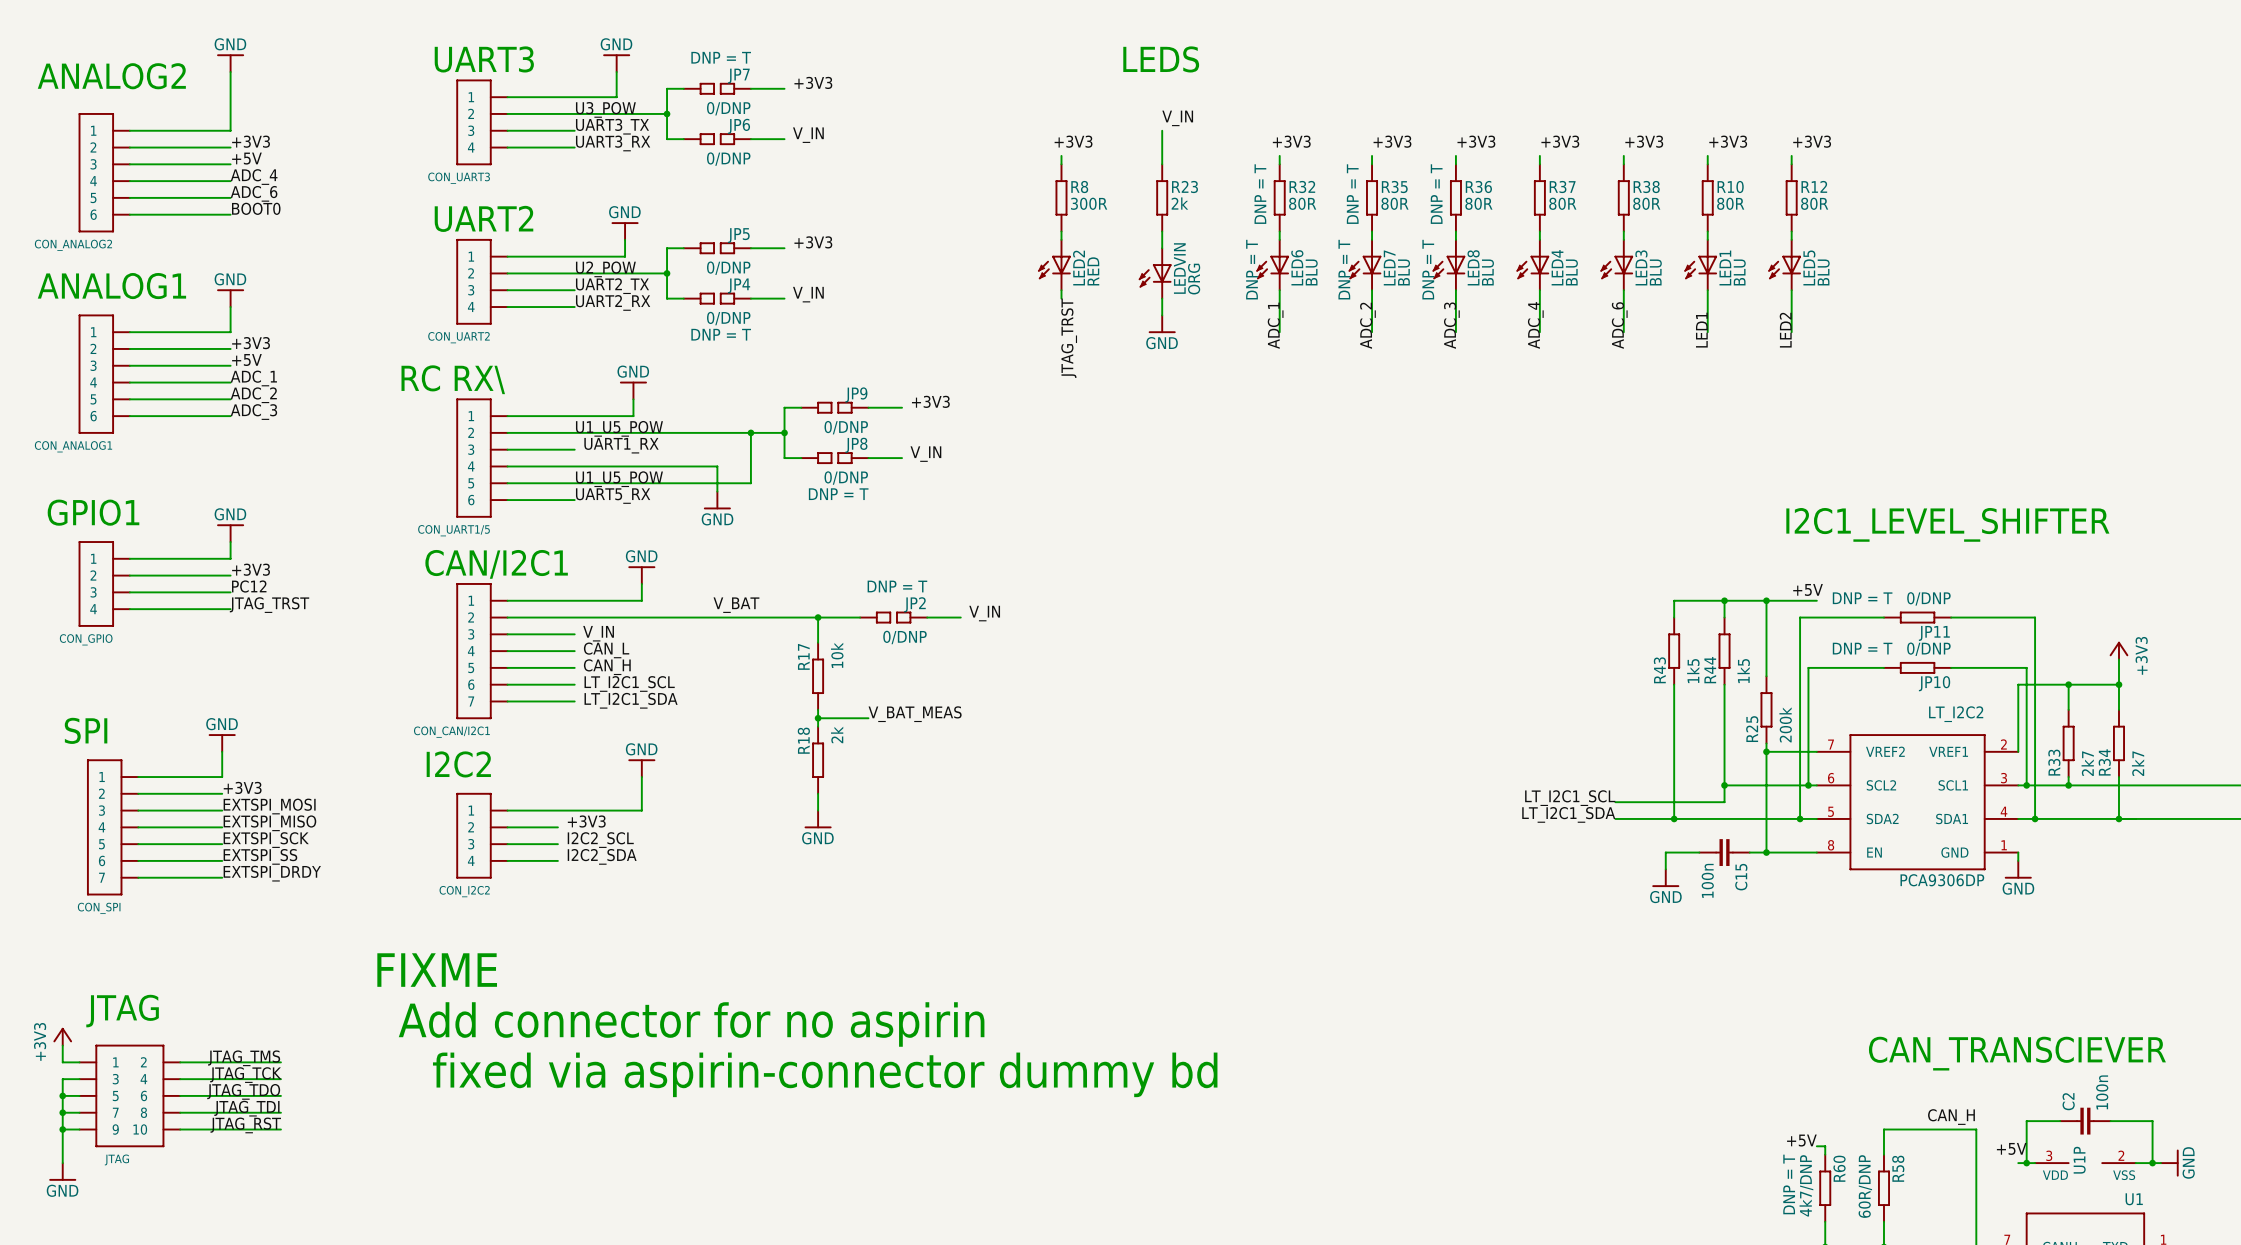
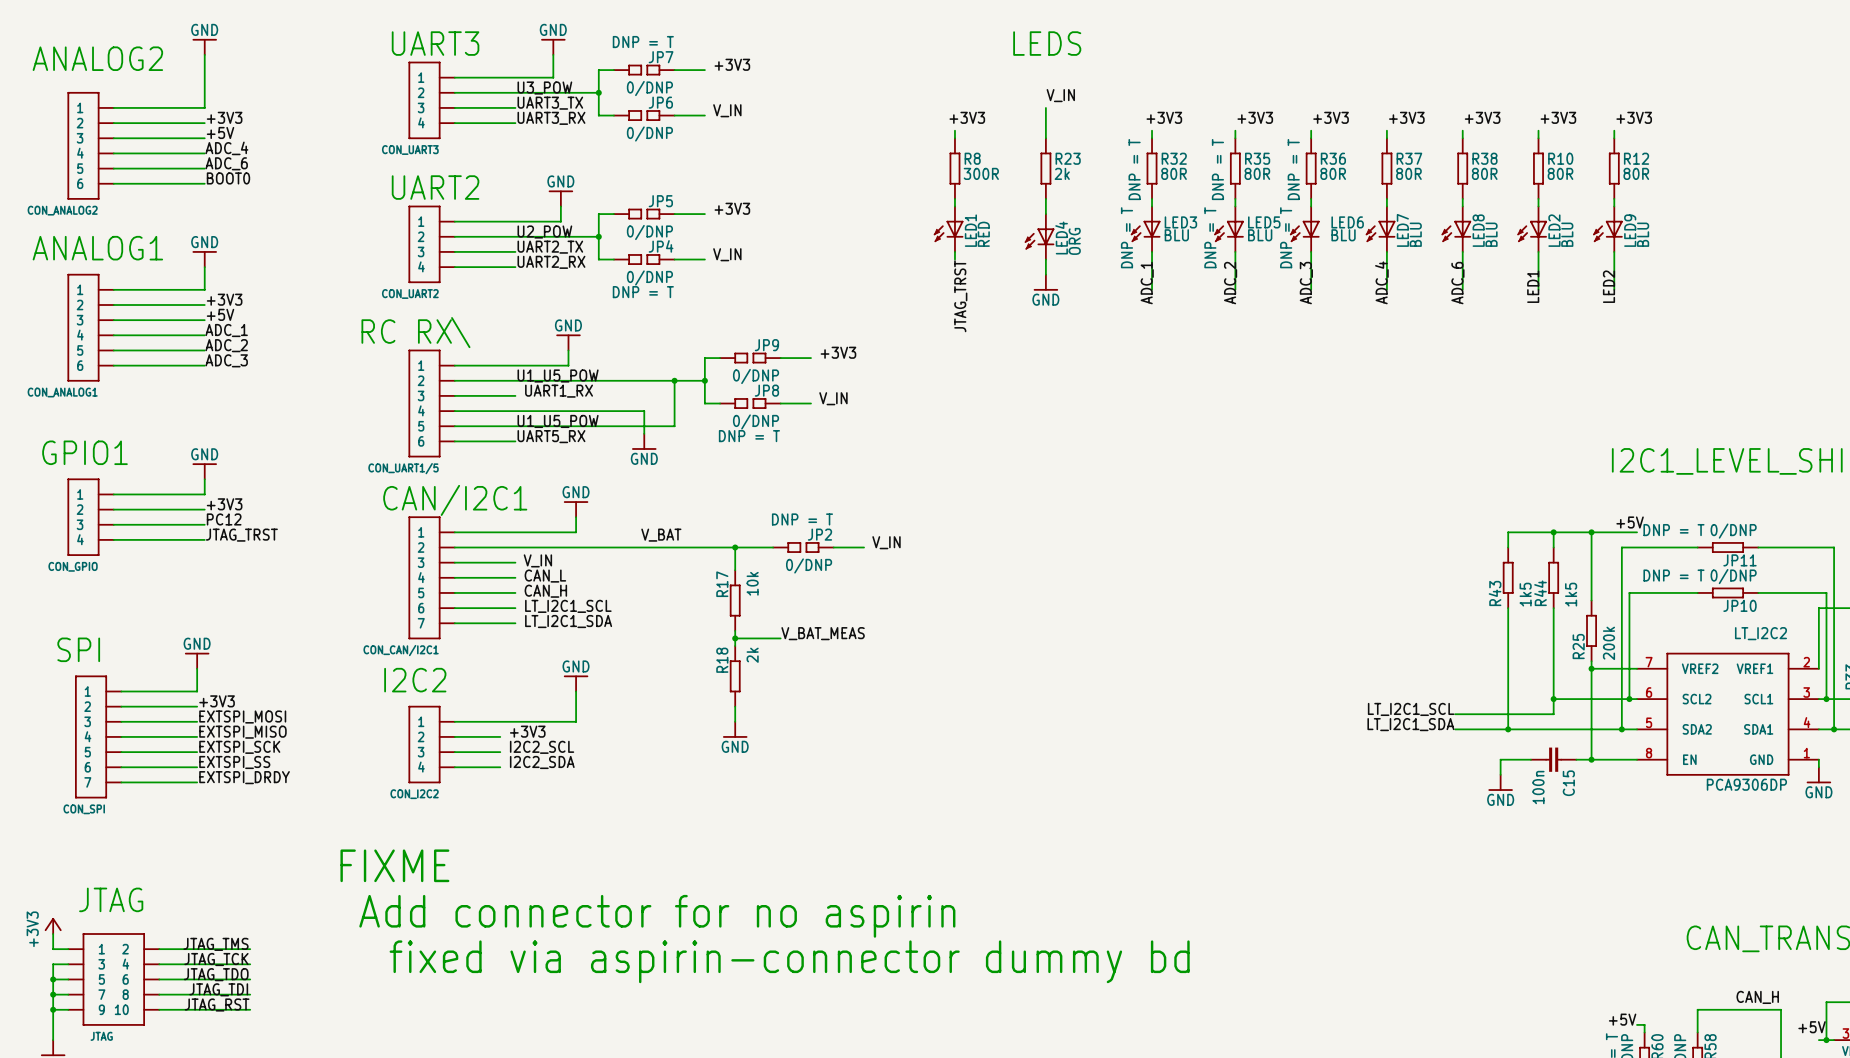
LED6 name: LED6 (1297, 267) -> LED3 (1180, 222)
LED7 name: LED7 (1389, 267) -> LED5 (1264, 222)
LED8 name: LED8 (1473, 267) -> LED6 (1347, 222)
LED4 name: LED4 (1557, 267) -> LED7 (1402, 230)
LED3 name: LED3 (1641, 267) -> LED8 (1478, 230)
LED5 name: LED5 (1809, 267) -> LED9 (1630, 230)
LED2 name: LED2 (1079, 268) -> LED1 (970, 230)
LEDVIN name: LEDVIN (1179, 268) -> LED4 (1061, 237)
LED1 name: LED1 (1725, 268) -> LED2 (1554, 230)
LED6 value rotation: 0° (1311, 272) -> 90° clockwise (1176, 235)
LED7 value rotation: 0° (1404, 272) -> 90° clockwise (1260, 235)
LED8 value rotation: 0° (1487, 272) -> 90° clockwise (1343, 235)

